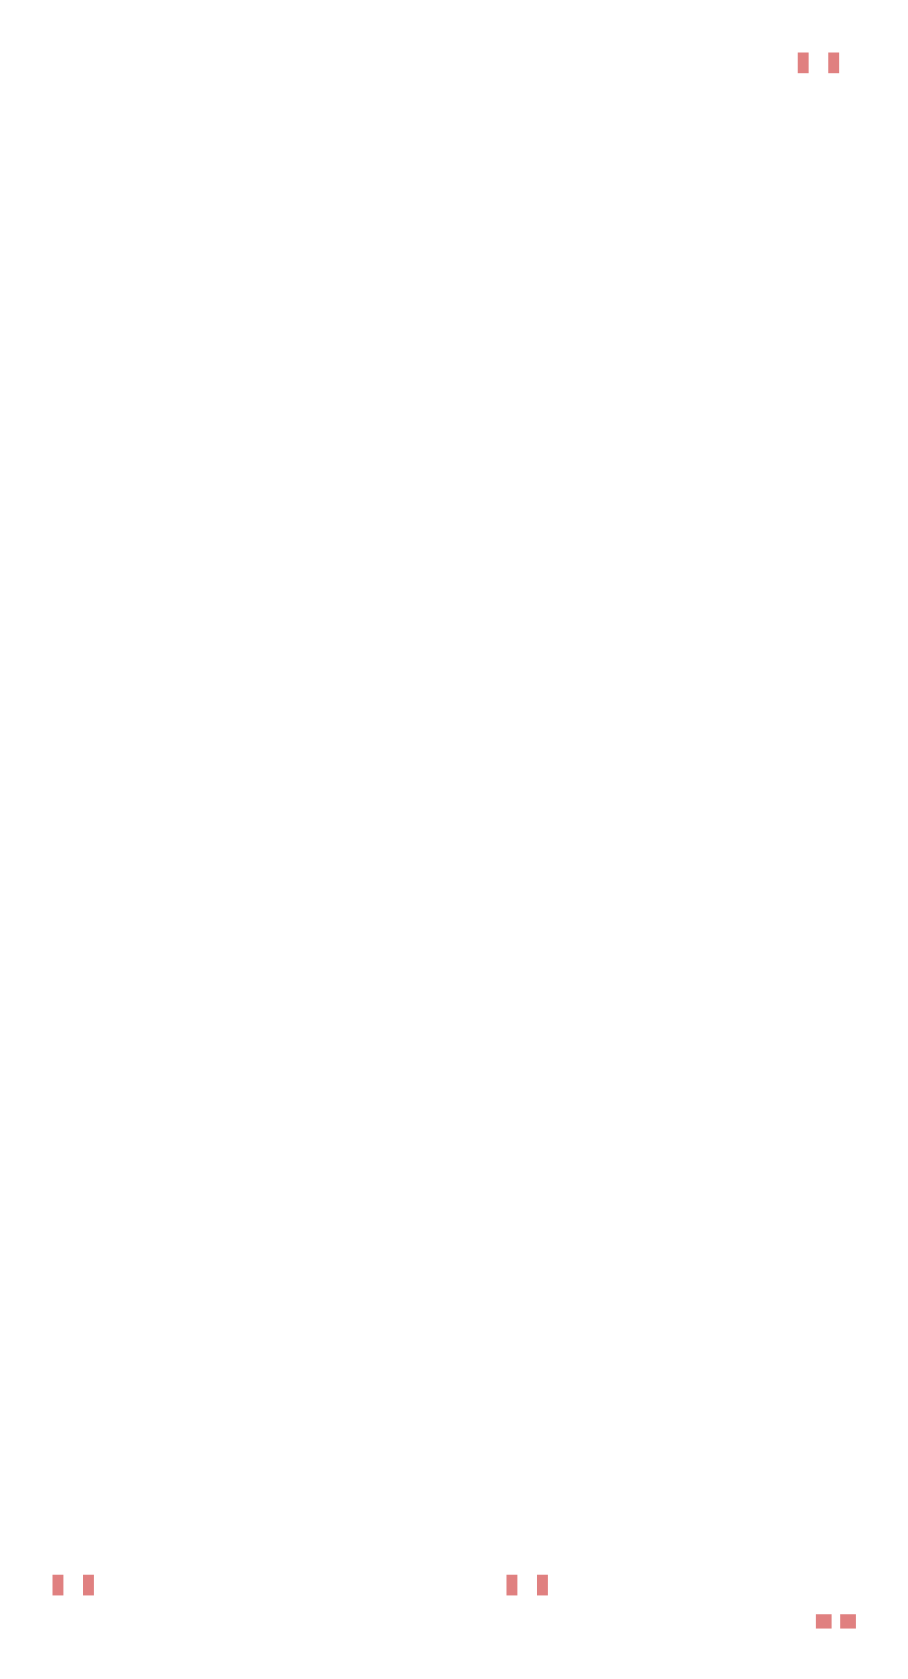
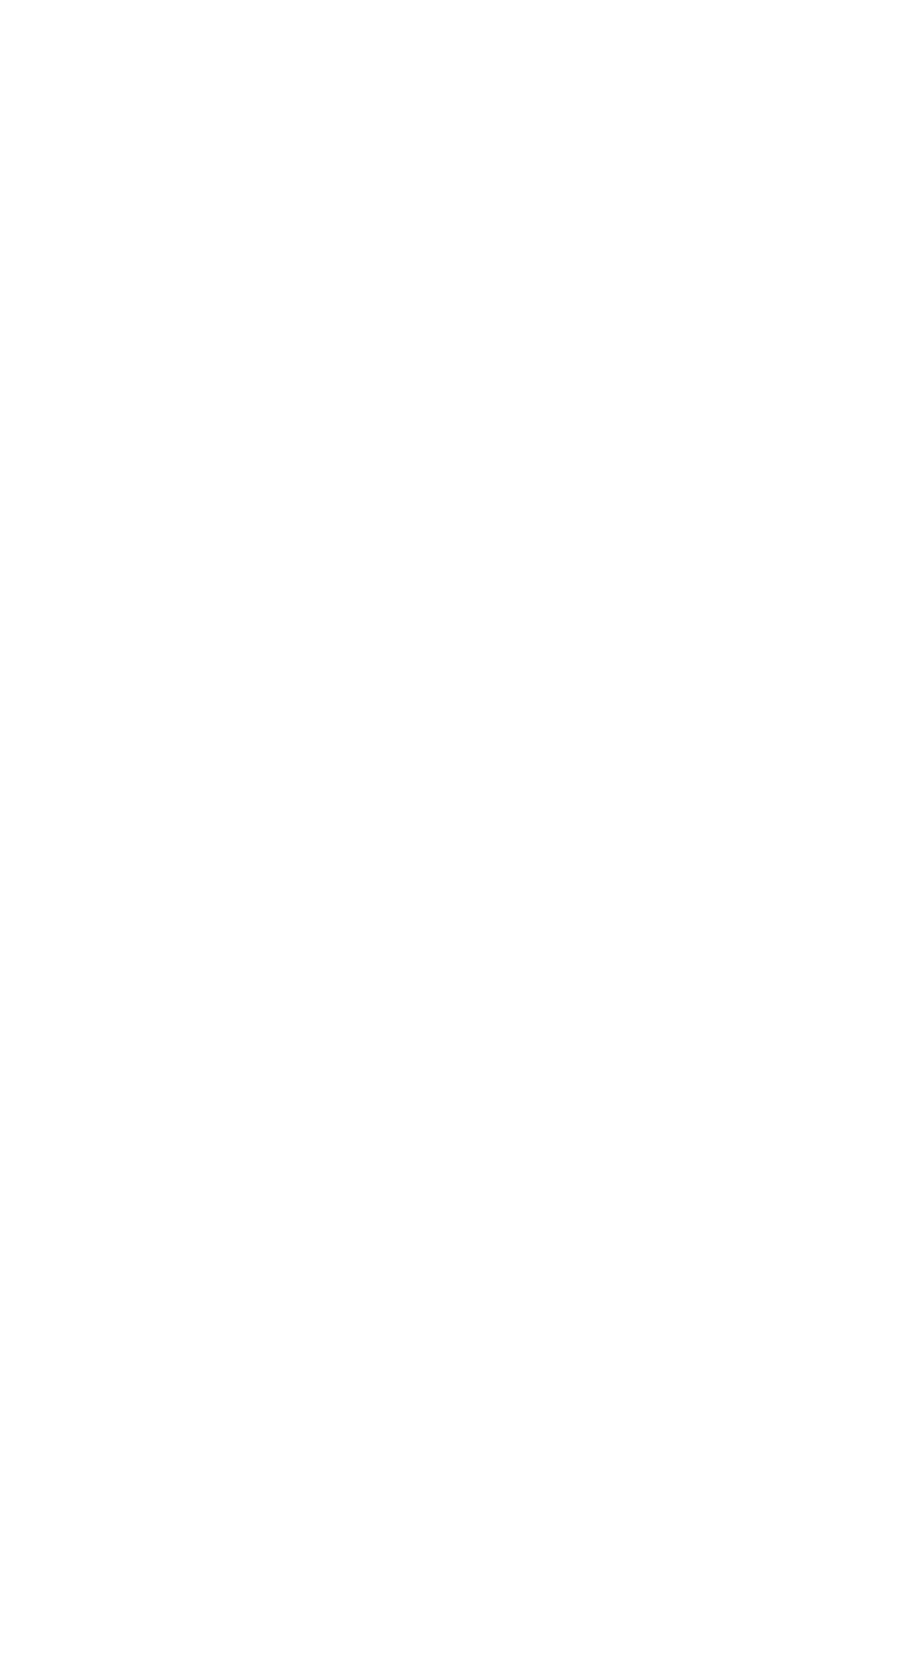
part: (818, 62) -> none
part: (73, 1585) -> none
part: (527, 1585) -> none
part: (835, 1621) -> none

